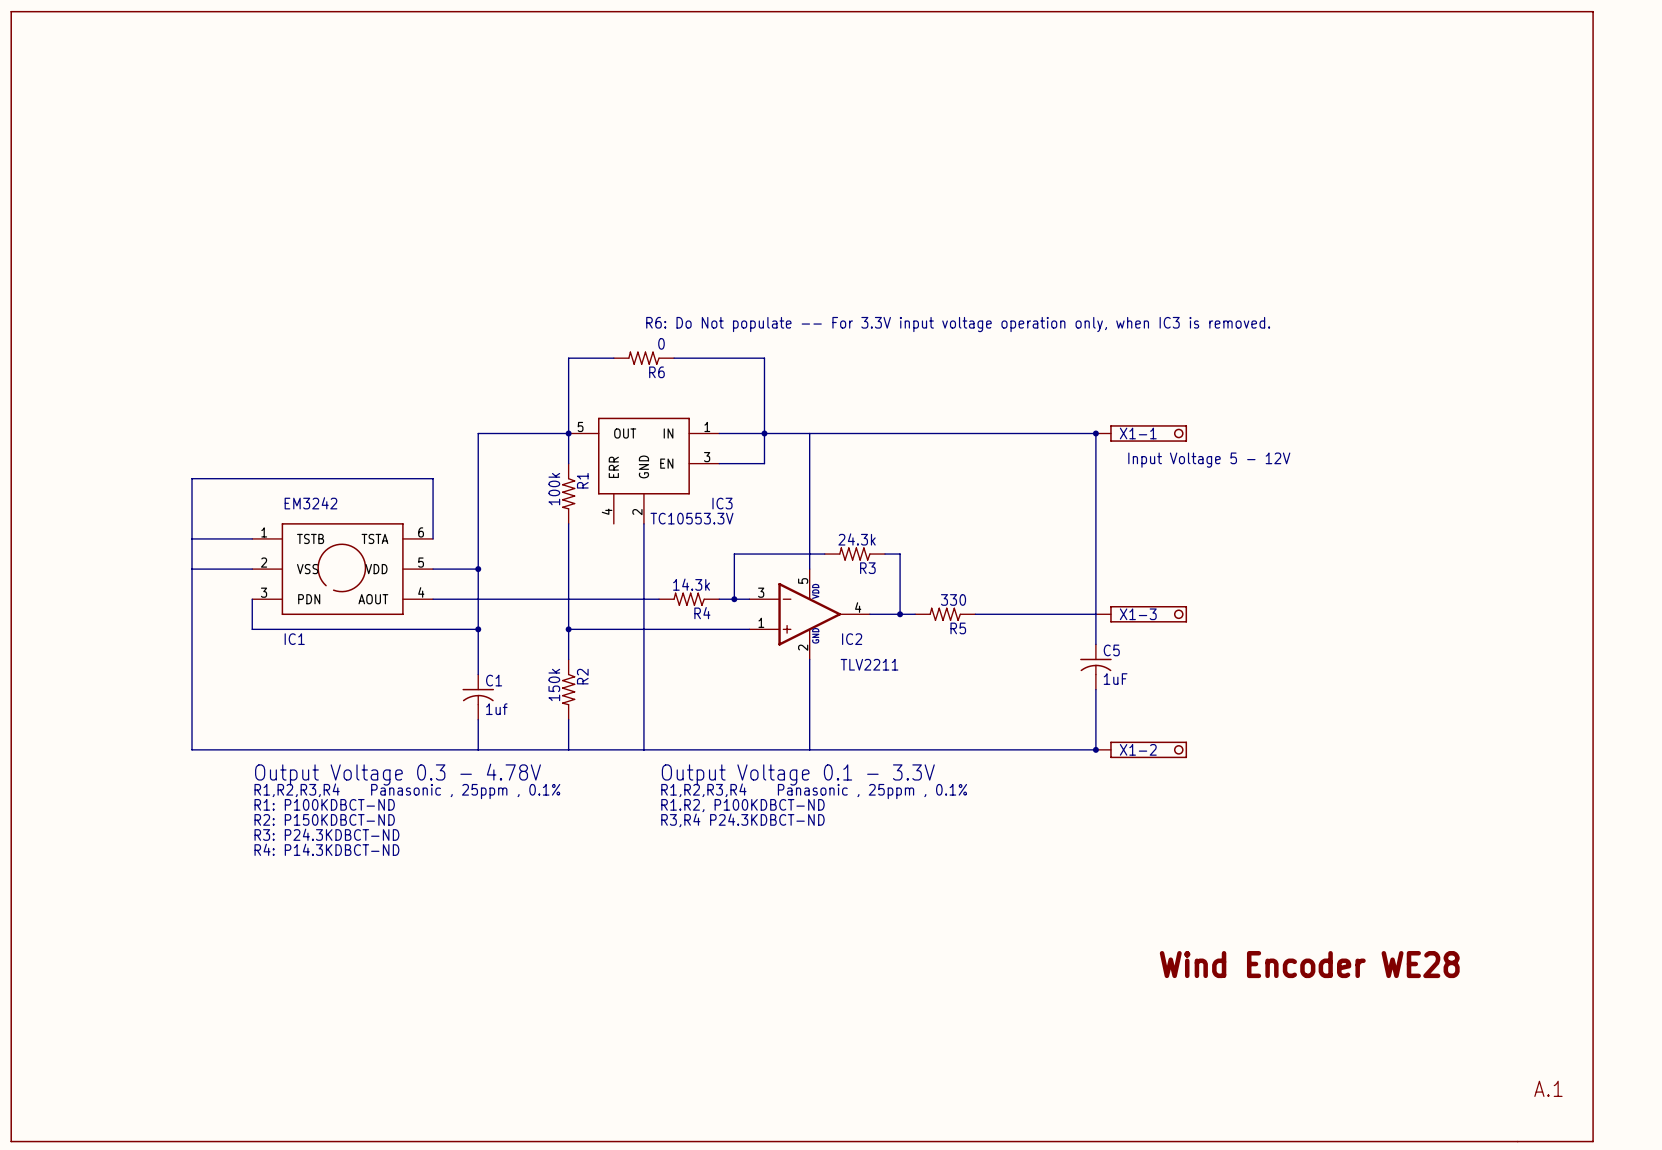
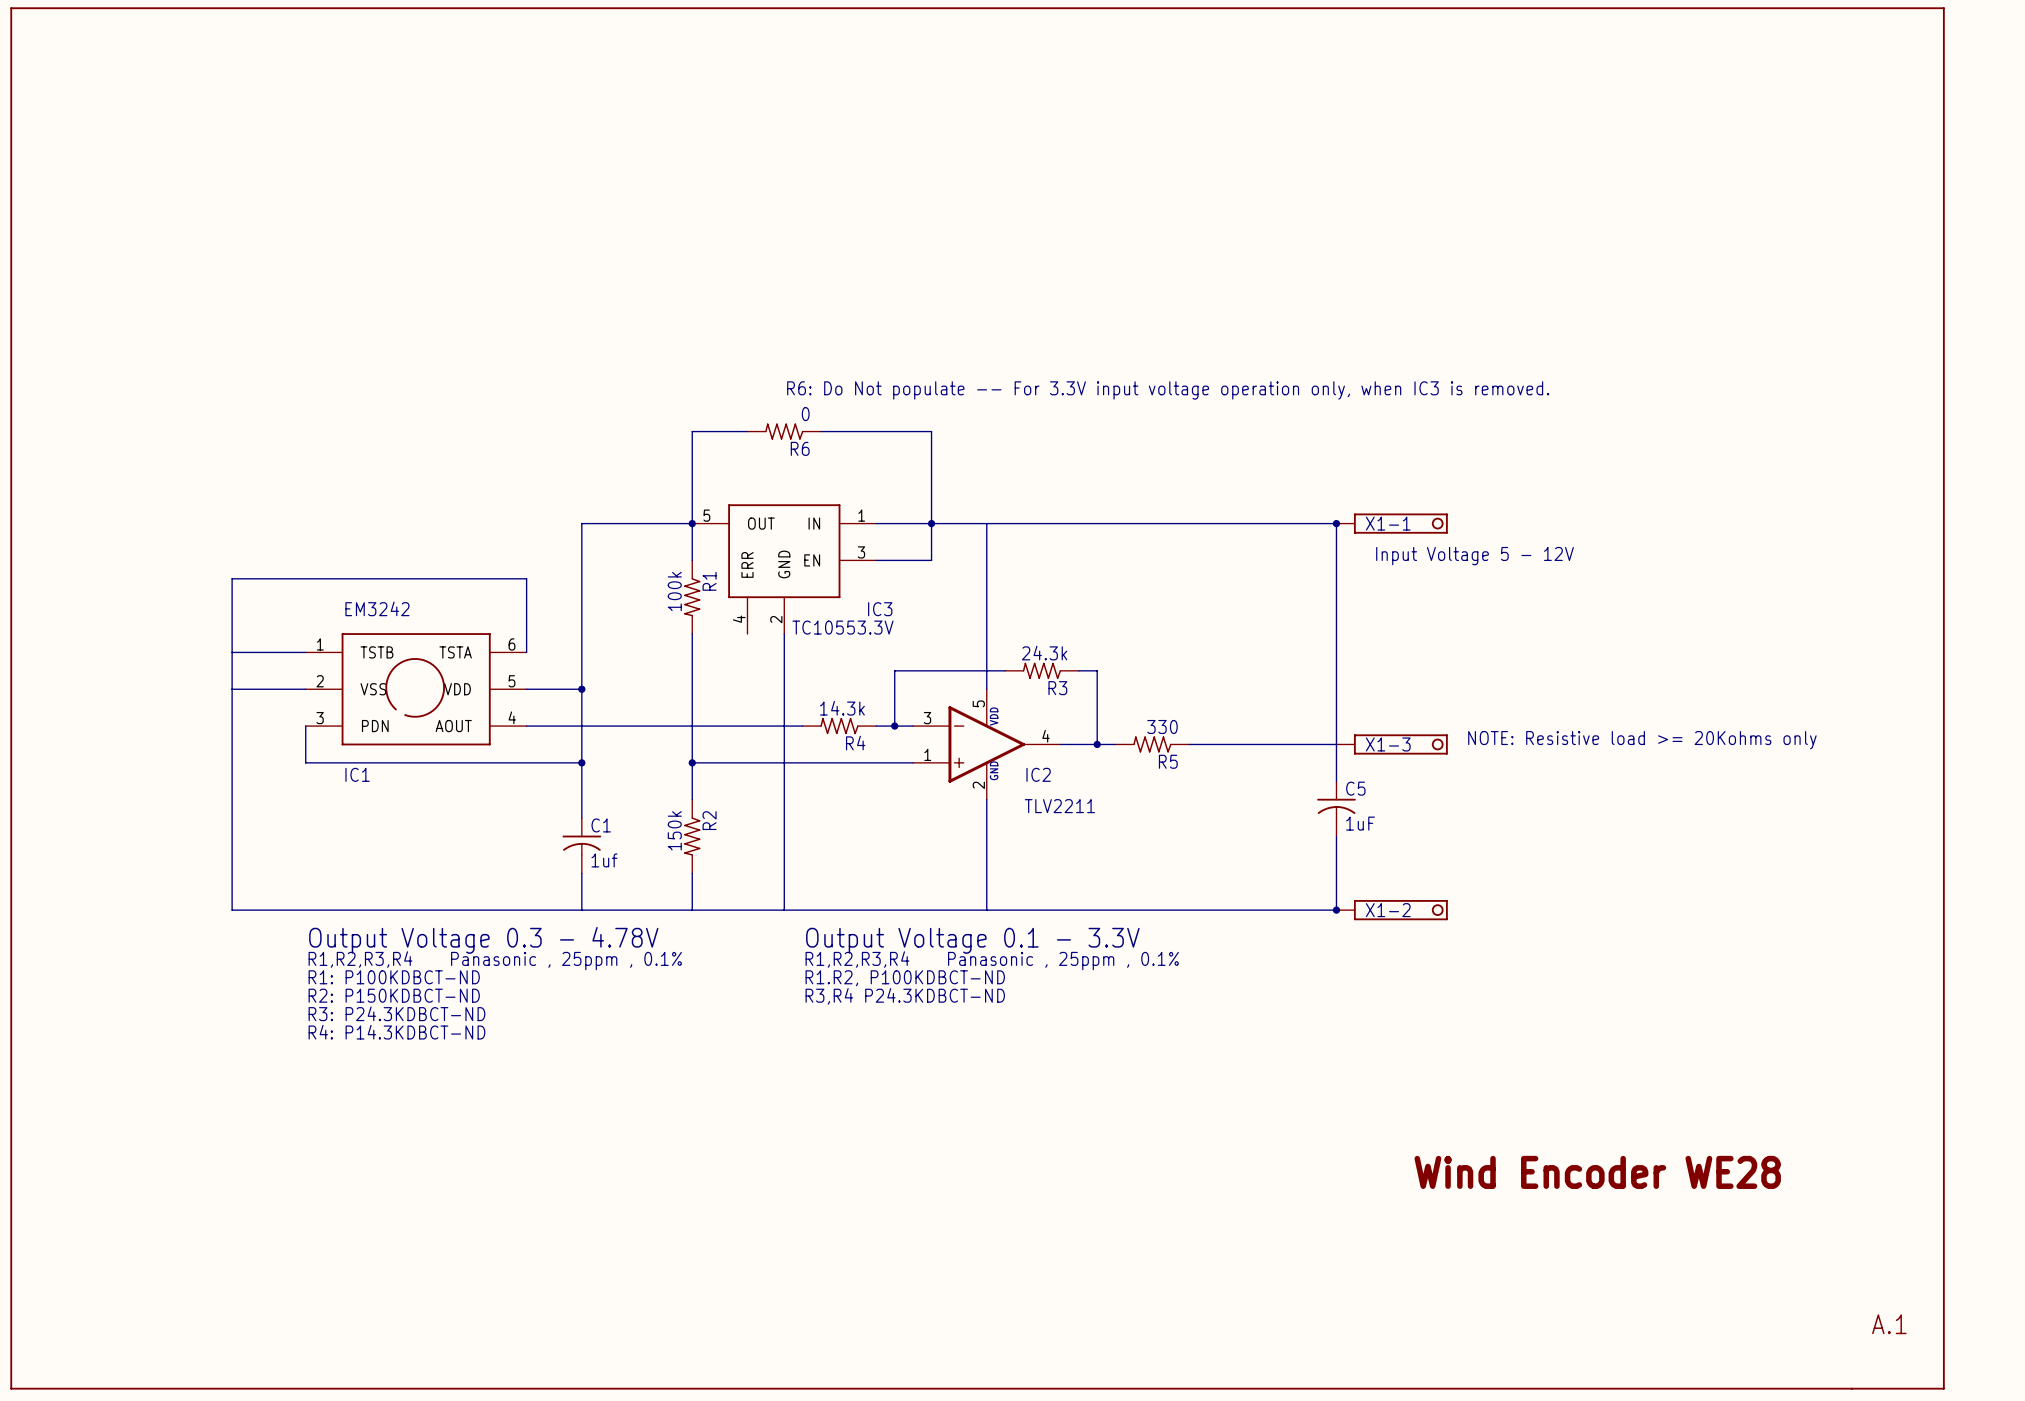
text: none -> NOTE: Resistive load >= 20Kohms only (1642, 740)

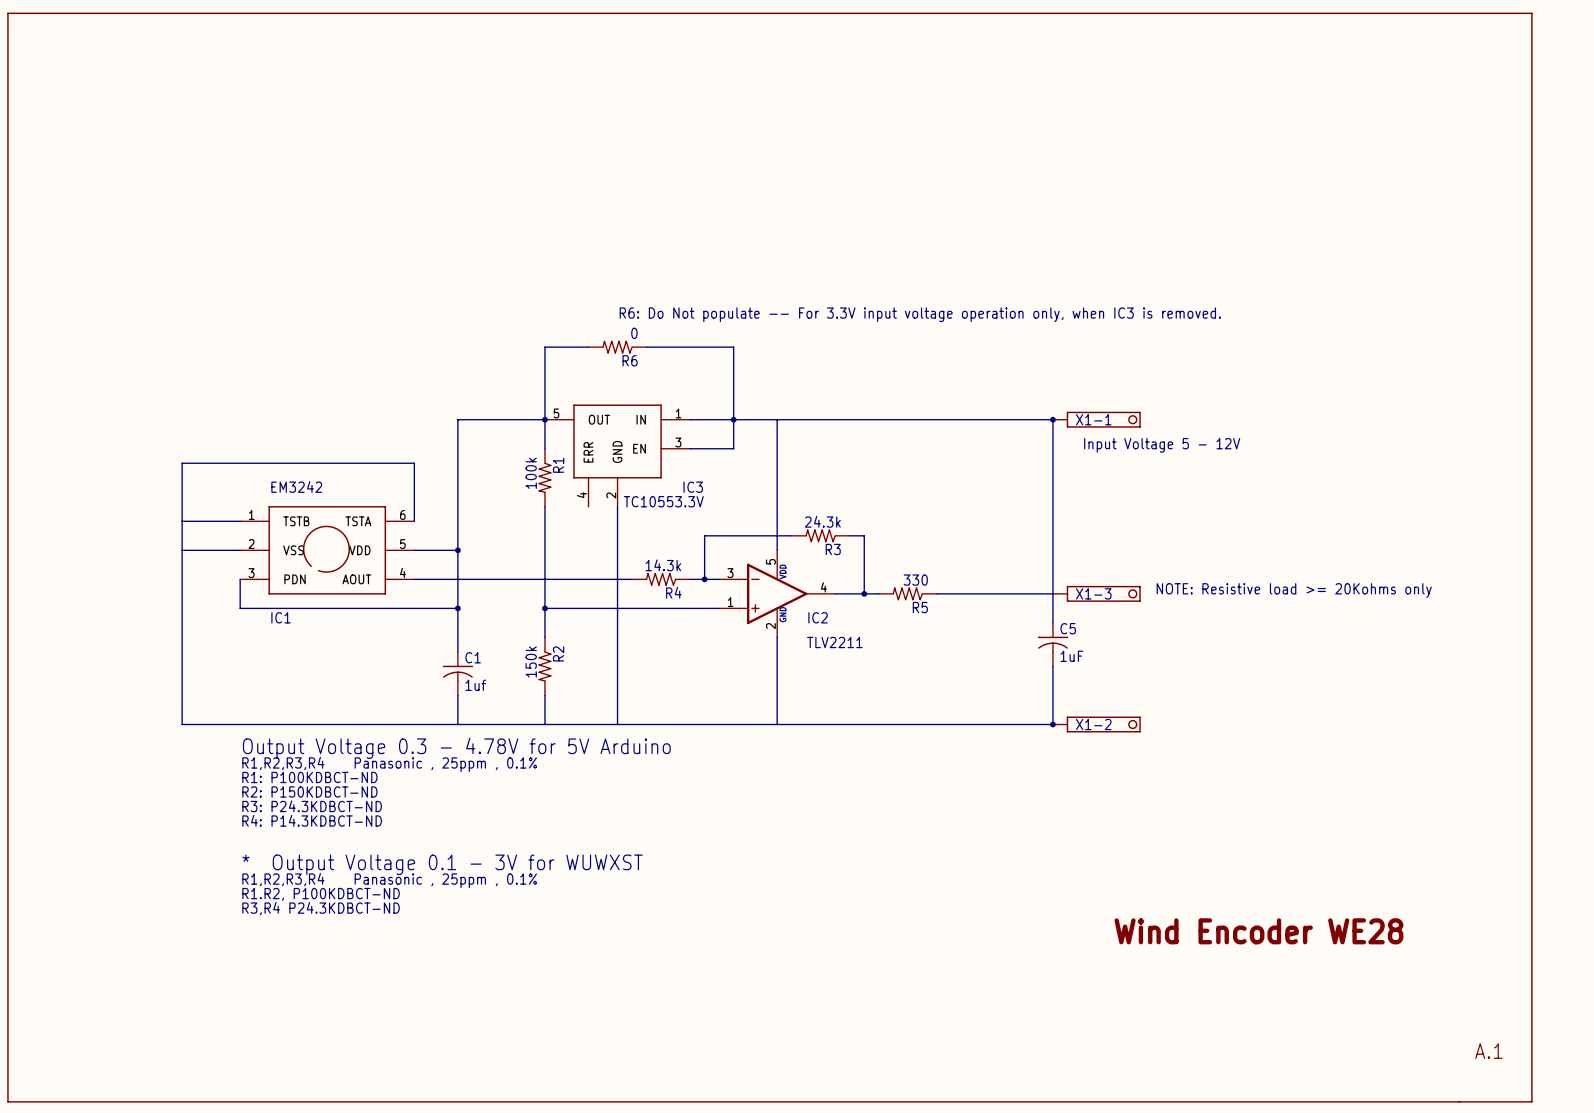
text: Output Voltage 0.3 - 4.78V (483, 940) -> Output Voltage 0.3 - 4.78V for 5V Arduino (456, 748)
text: Output Voltage 0.1 - 3.3V (972, 940) -> none
text: R1,R2,R3,R4 Panasonic , 25ppm , 0.1% (992, 960) -> none
text: R1.R2, P100KDBCT-ND (905, 978) -> none
text: R3,R4 P24.3KDBCT-ND (905, 996) -> none
text: none -> * Output Voltage 0.1 - 3V for WUWXST (442, 864)
text: none -> R1,R2,R3,R4 Panasonic , 25ppm , 0.1% (389, 880)
text: none -> R1.R2, P100KDBCT-ND (321, 894)
text: none -> R3,R4 P24.3KDBCT-ND (321, 908)

